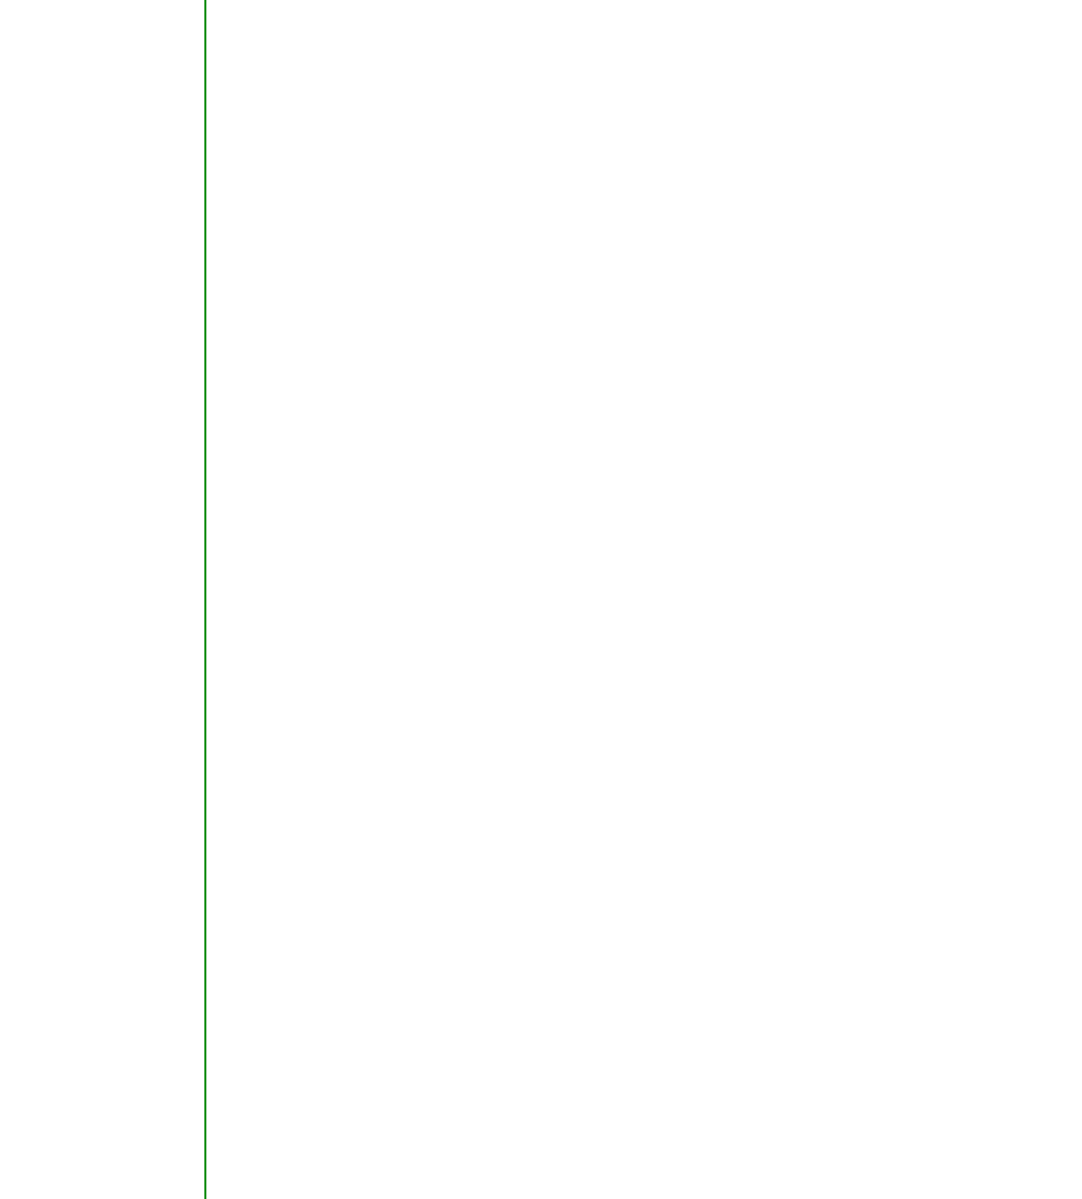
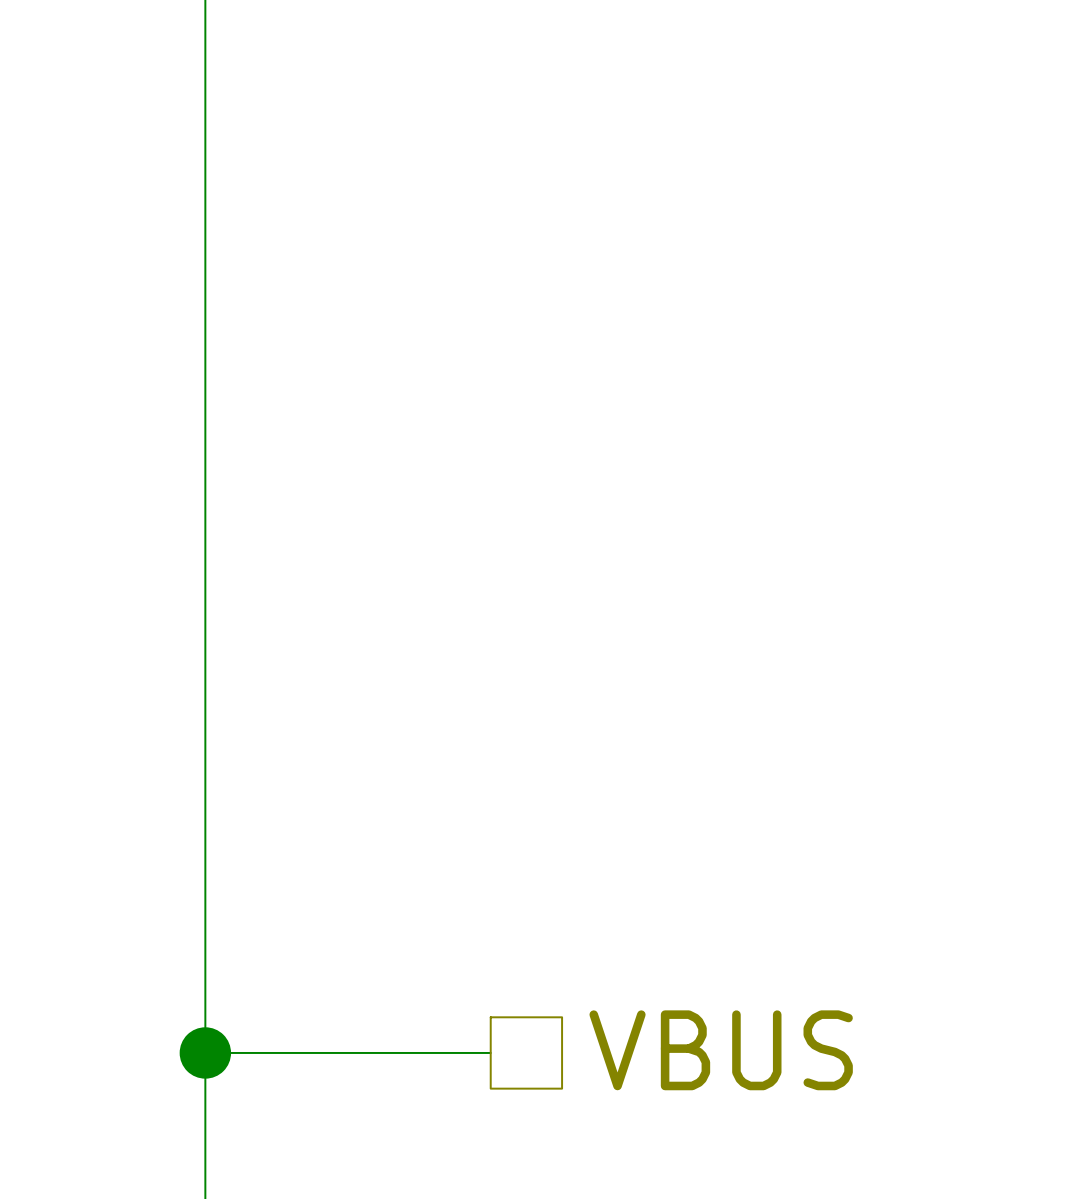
hierarchical label: none -> VBUS (721, 1050)
wire: none -> (205, 1052) (490, 1052)
junction: none -> (205, 1052)

